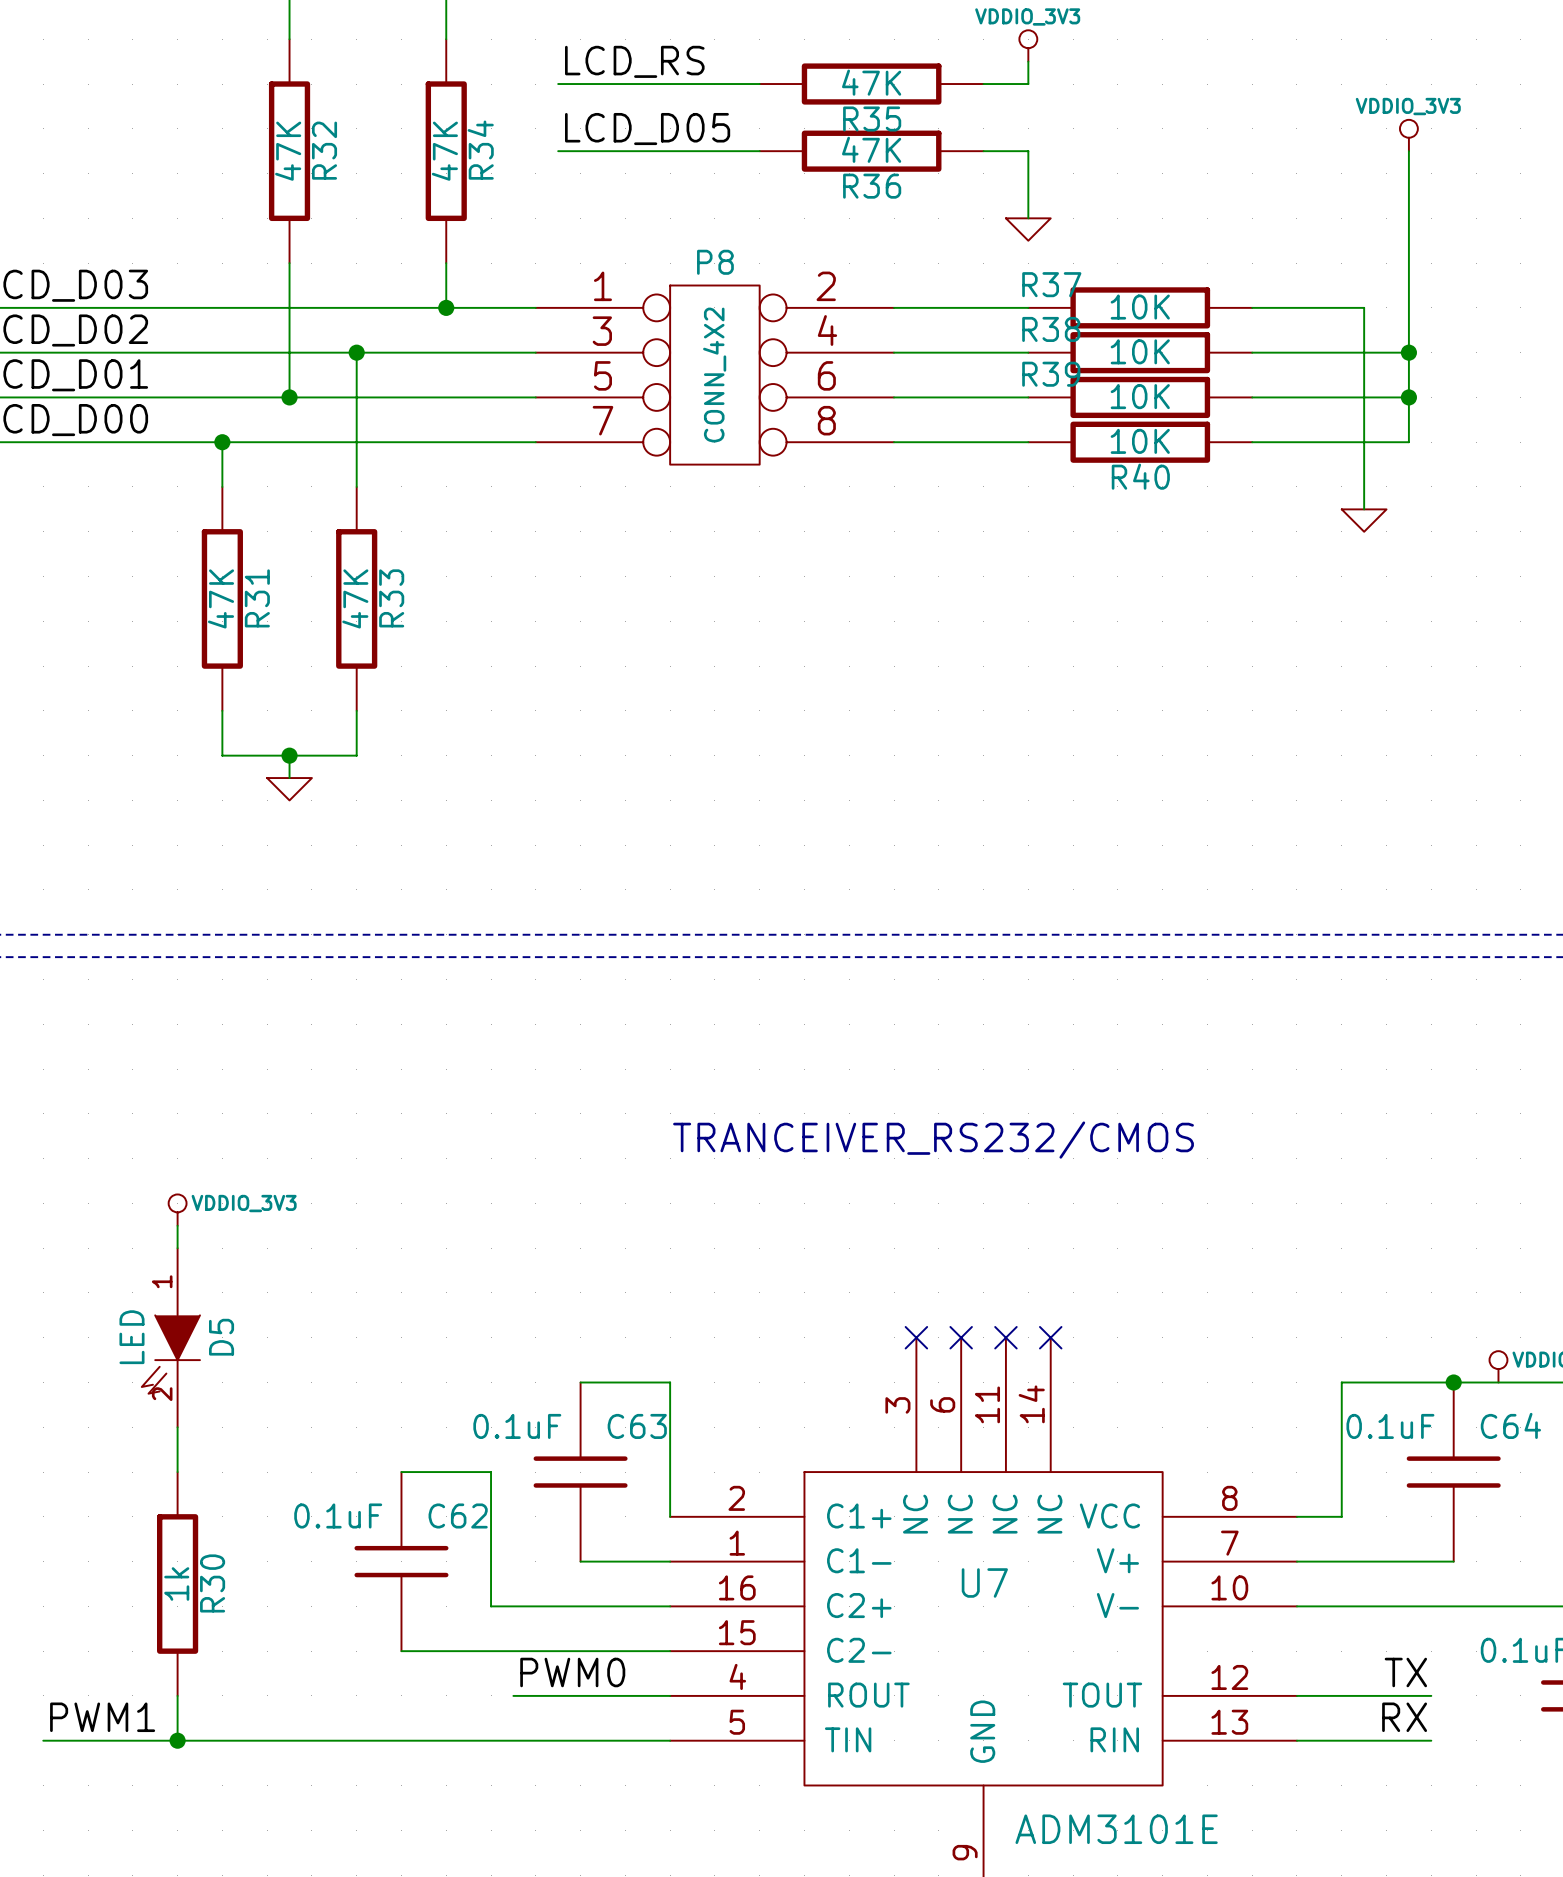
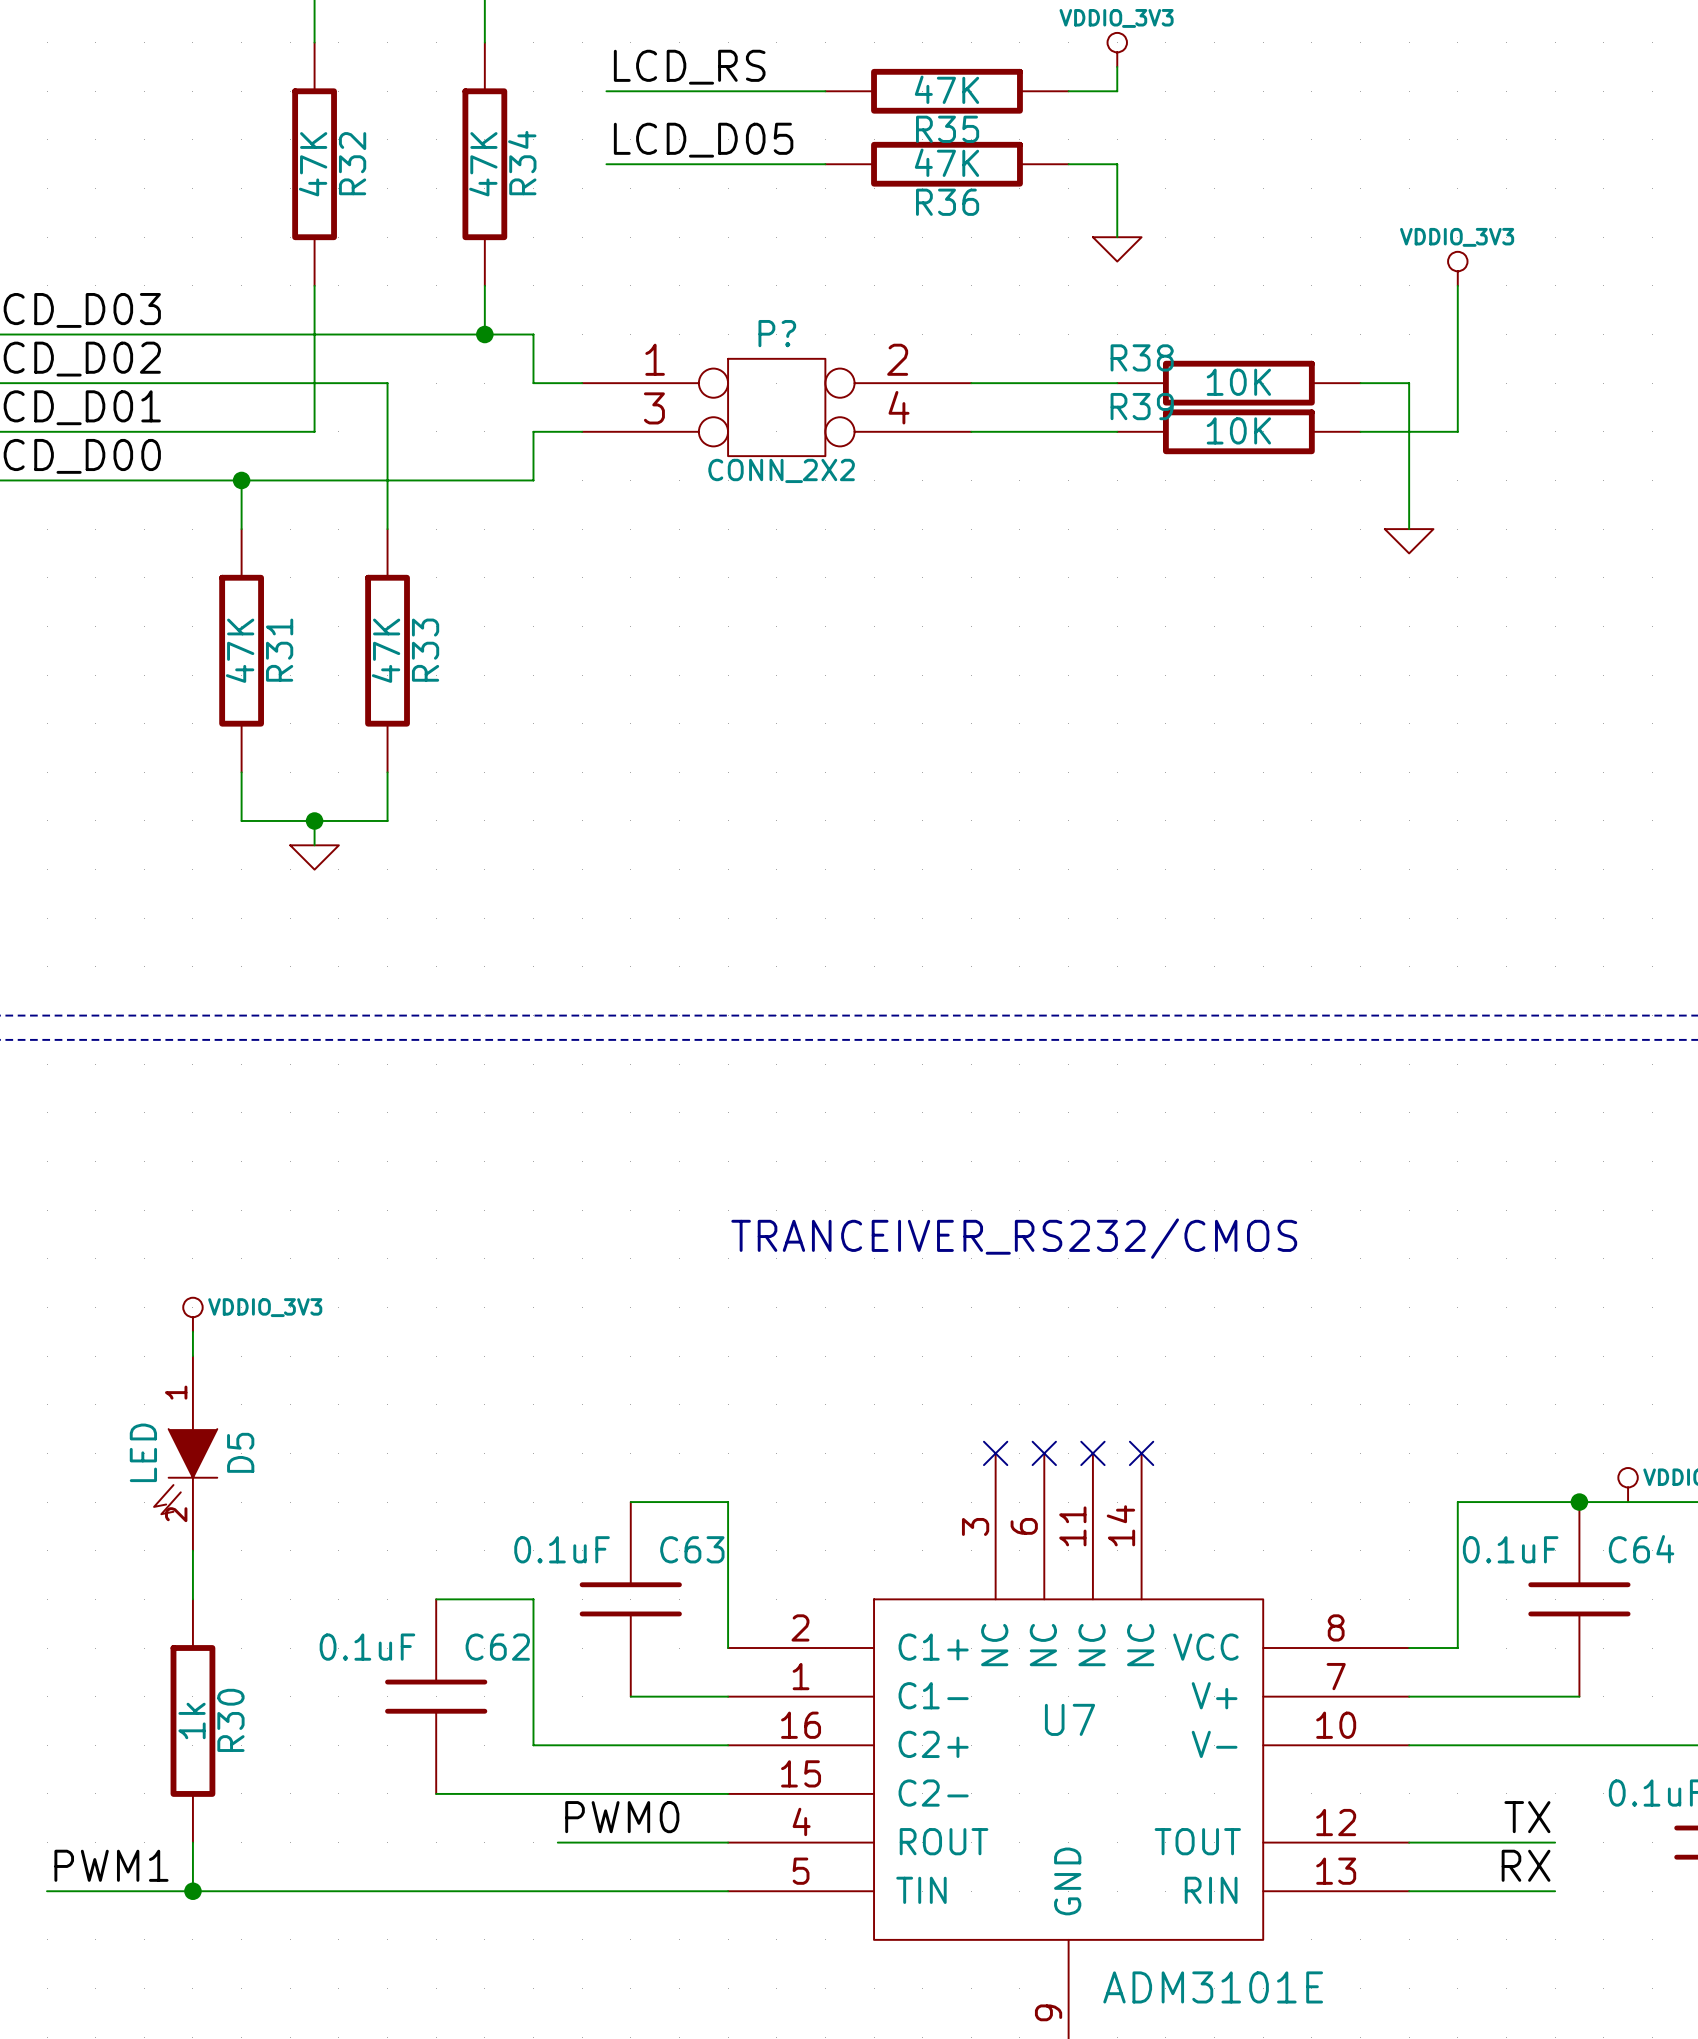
power symbol position: VDDIO_3V3 (1408, 135) -> VDDIO_3V3 (1457, 268)
wire: (1408, 151) (1408, 442) (1252, 442) -> none
wire: (491, 307) (535, 307) -> (533, 334) (533, 383)
wire: (894, 307) (1028, 307) -> none
R37: 10K (1140, 307) -> none
wire: (1252, 307) (1364, 307) (1364, 509) -> none
wire: (356, 352) (491, 352) -> none
junction: (356, 352) -> none
wire: (1296, 352) (1408, 352) -> (1409, 383) (1409, 529)
junction: (1408, 352) -> none
P8: CONN_4X2 (714, 375) -> none
P?: none -> CONN_2X2 (776, 407)
wire: (289, 397) (491, 397) -> none
junction: (289, 397) -> none
wire: (1341, 397) (1408, 397) -> (1457, 431) (1457, 285)
junction: (1408, 397) -> none
wire: (491, 442) (535, 442) -> (533, 480) (533, 431)
wire: (894, 442) (1028, 442) -> none
R40: 10K (1140, 442) -> none
power symbol position: (1364, 520) -> (1409, 541)

